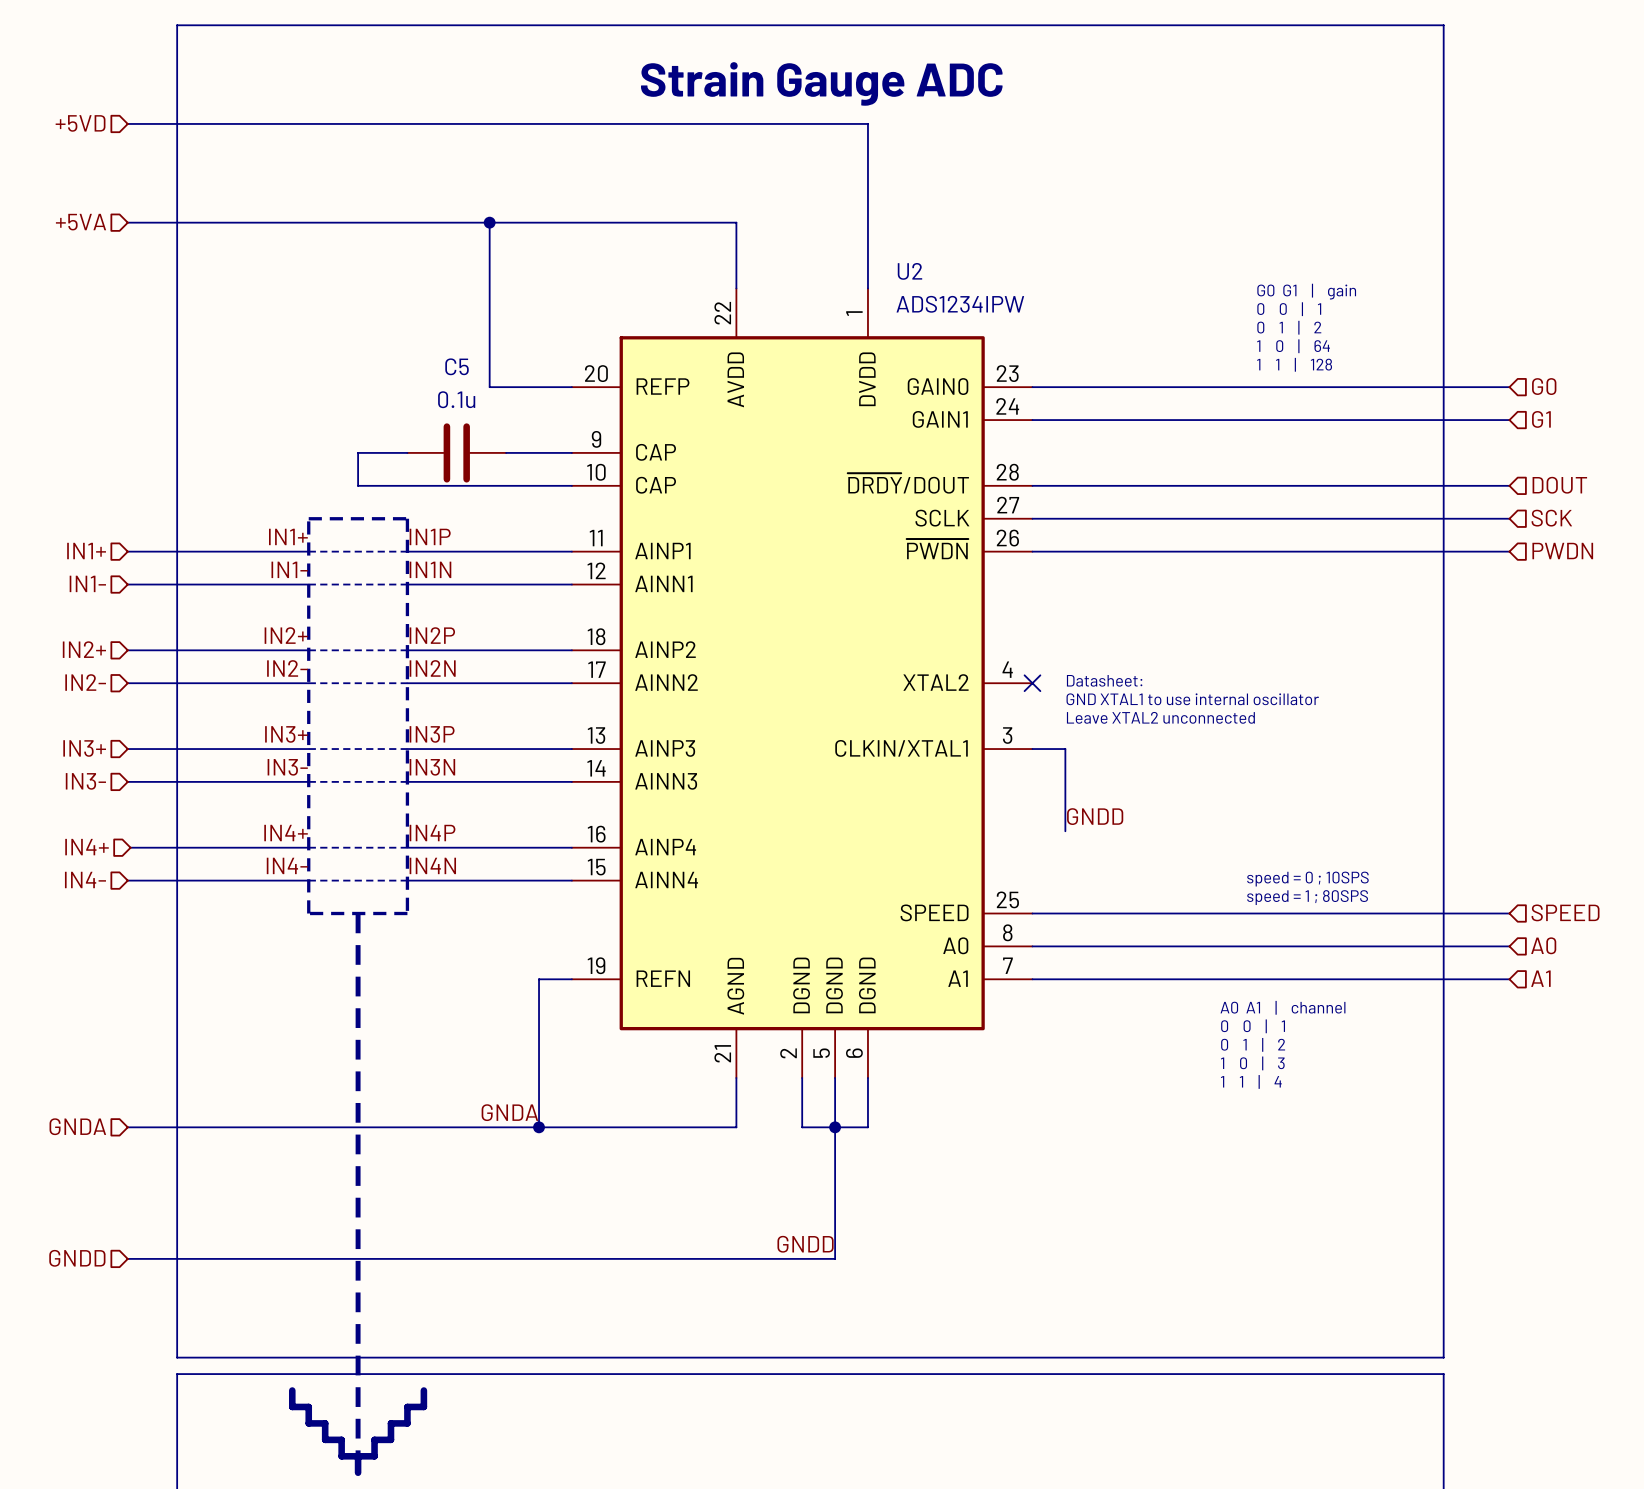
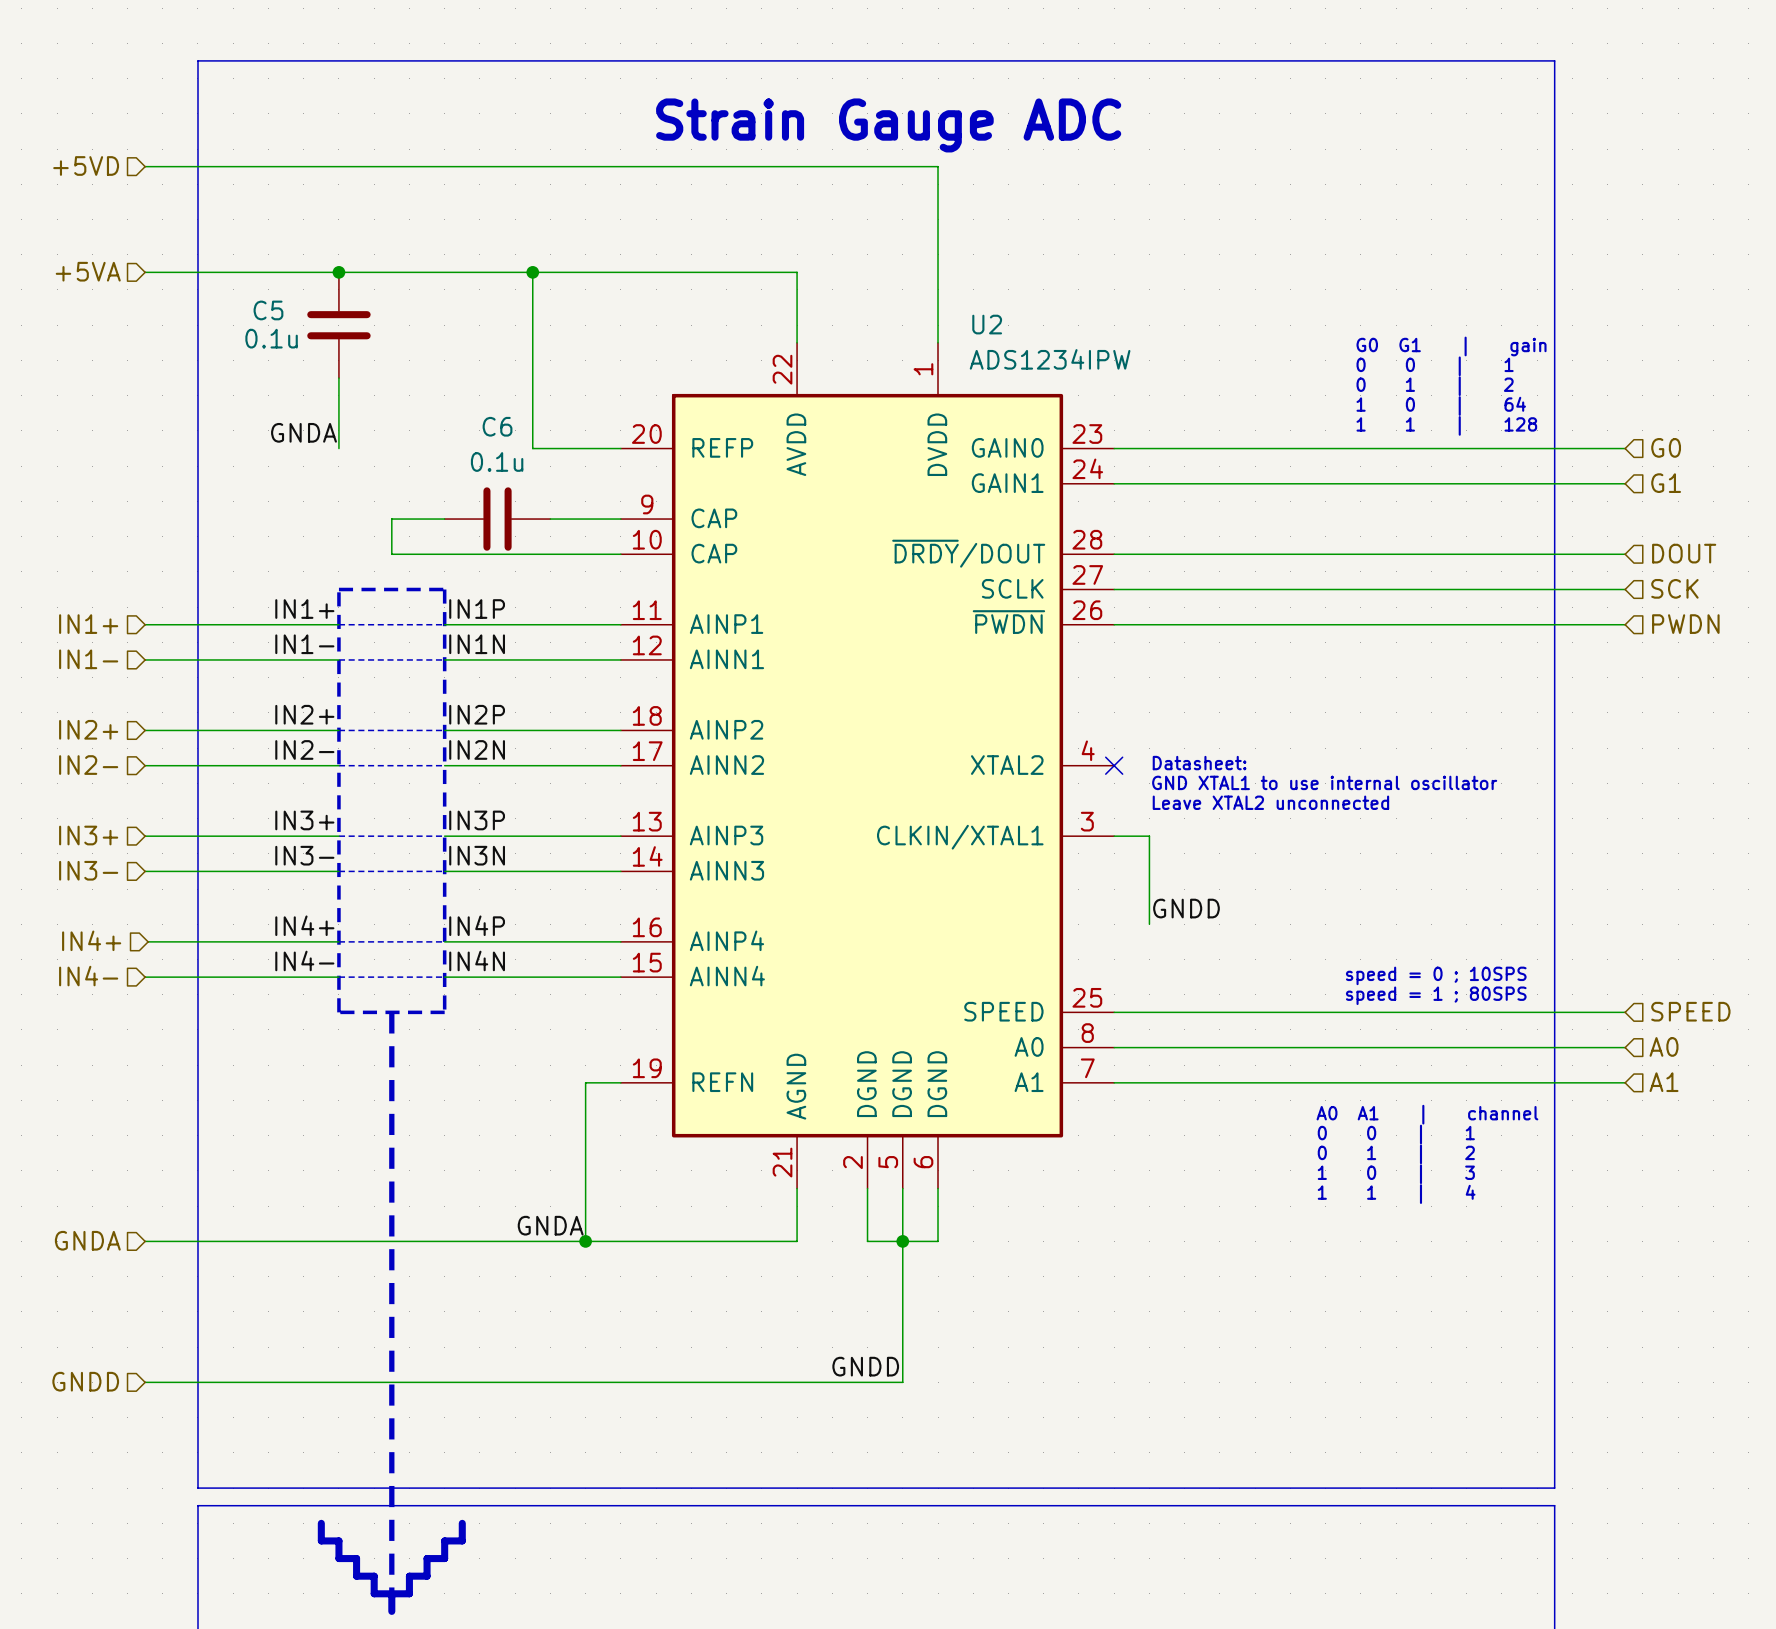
junction: none -> (338, 272)
C5: none -> 0.1u (338, 325)
wire: none -> (338, 378) (338, 448)
C5 name: C5 (457, 366) -> C6 (497, 426)
label: none -> GNDA (304, 432)

